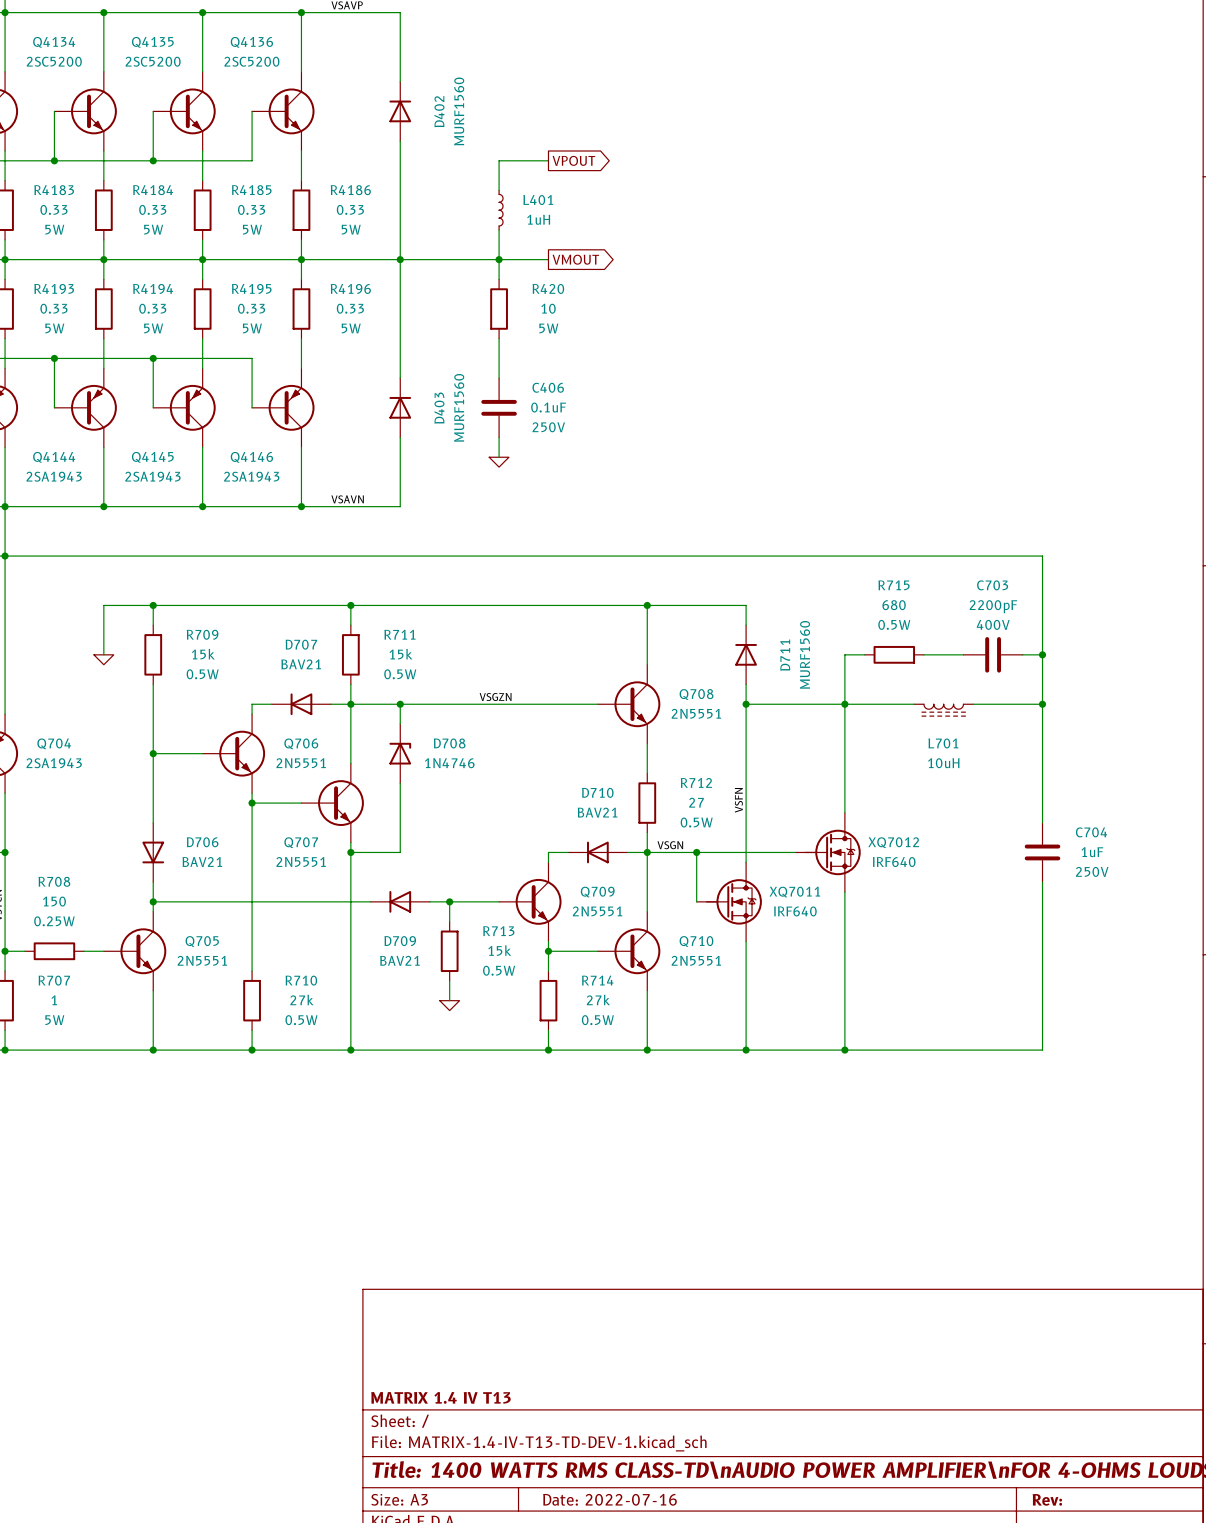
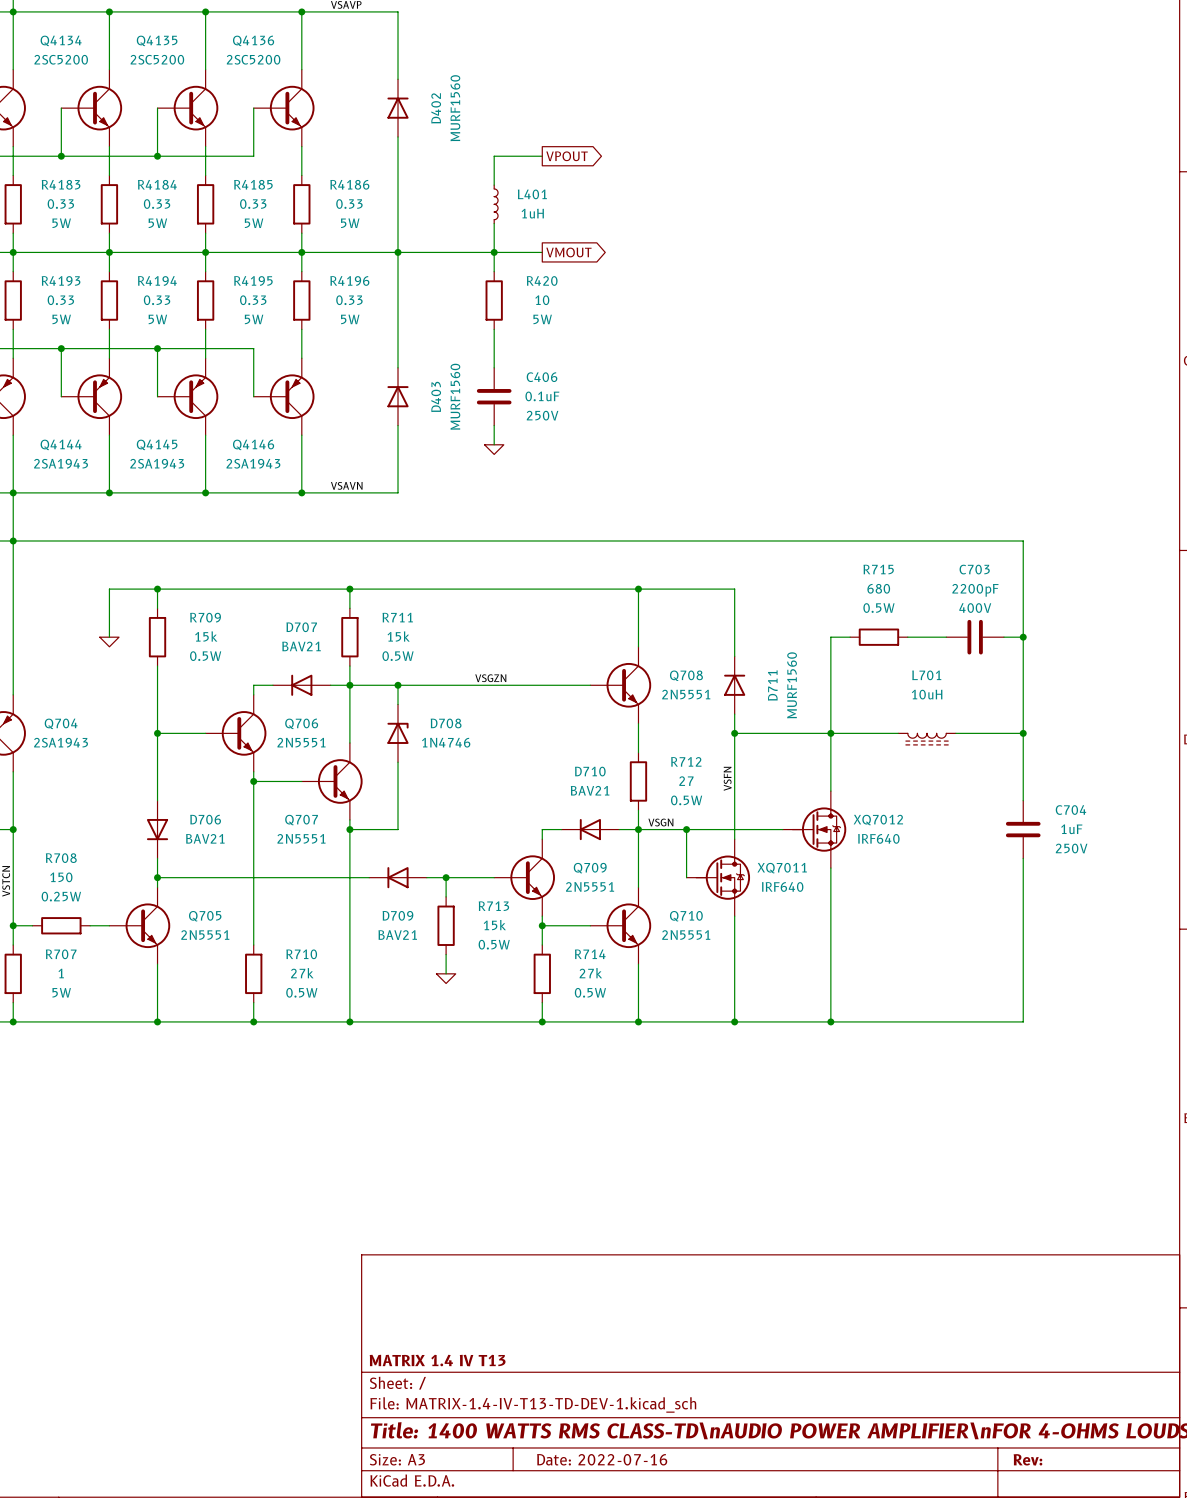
D711 position: (746, 654) -> (734, 685)
wire: (746, 704) (914, 704) -> (734, 733) (898, 733)
junction: (746, 704) -> none
junction: (844, 704) -> none
wire: (973, 704) (1042, 704) -> (955, 733) (1023, 733)
junction: (1042, 704) -> none
L701 position: (943, 710) -> (927, 739)
L701 name position: L701 (943, 743) -> L701 (926, 675)
junction: none -> (734, 733)
junction: none -> (830, 733)
junction: none -> (1023, 733)
L701 value position: 10uH (943, 763) -> 10uH (927, 694)

